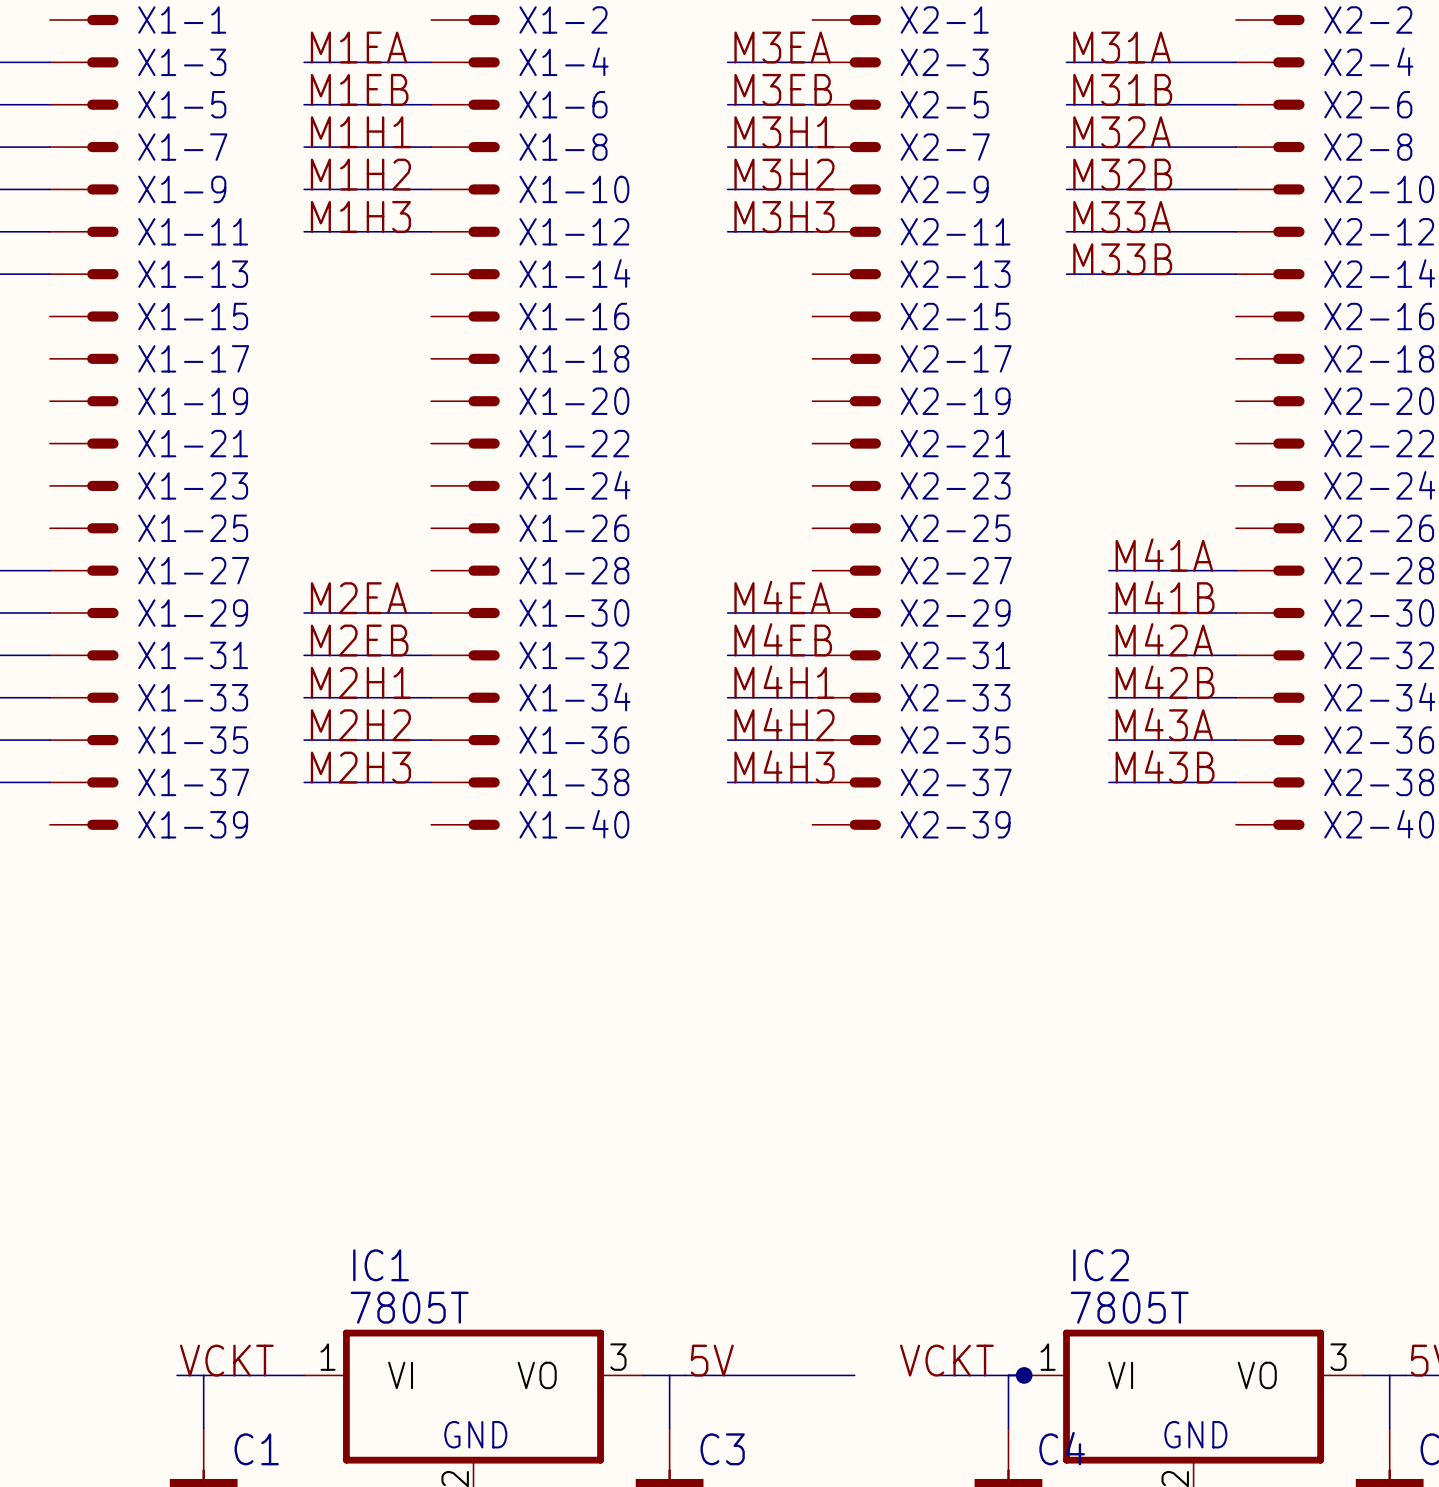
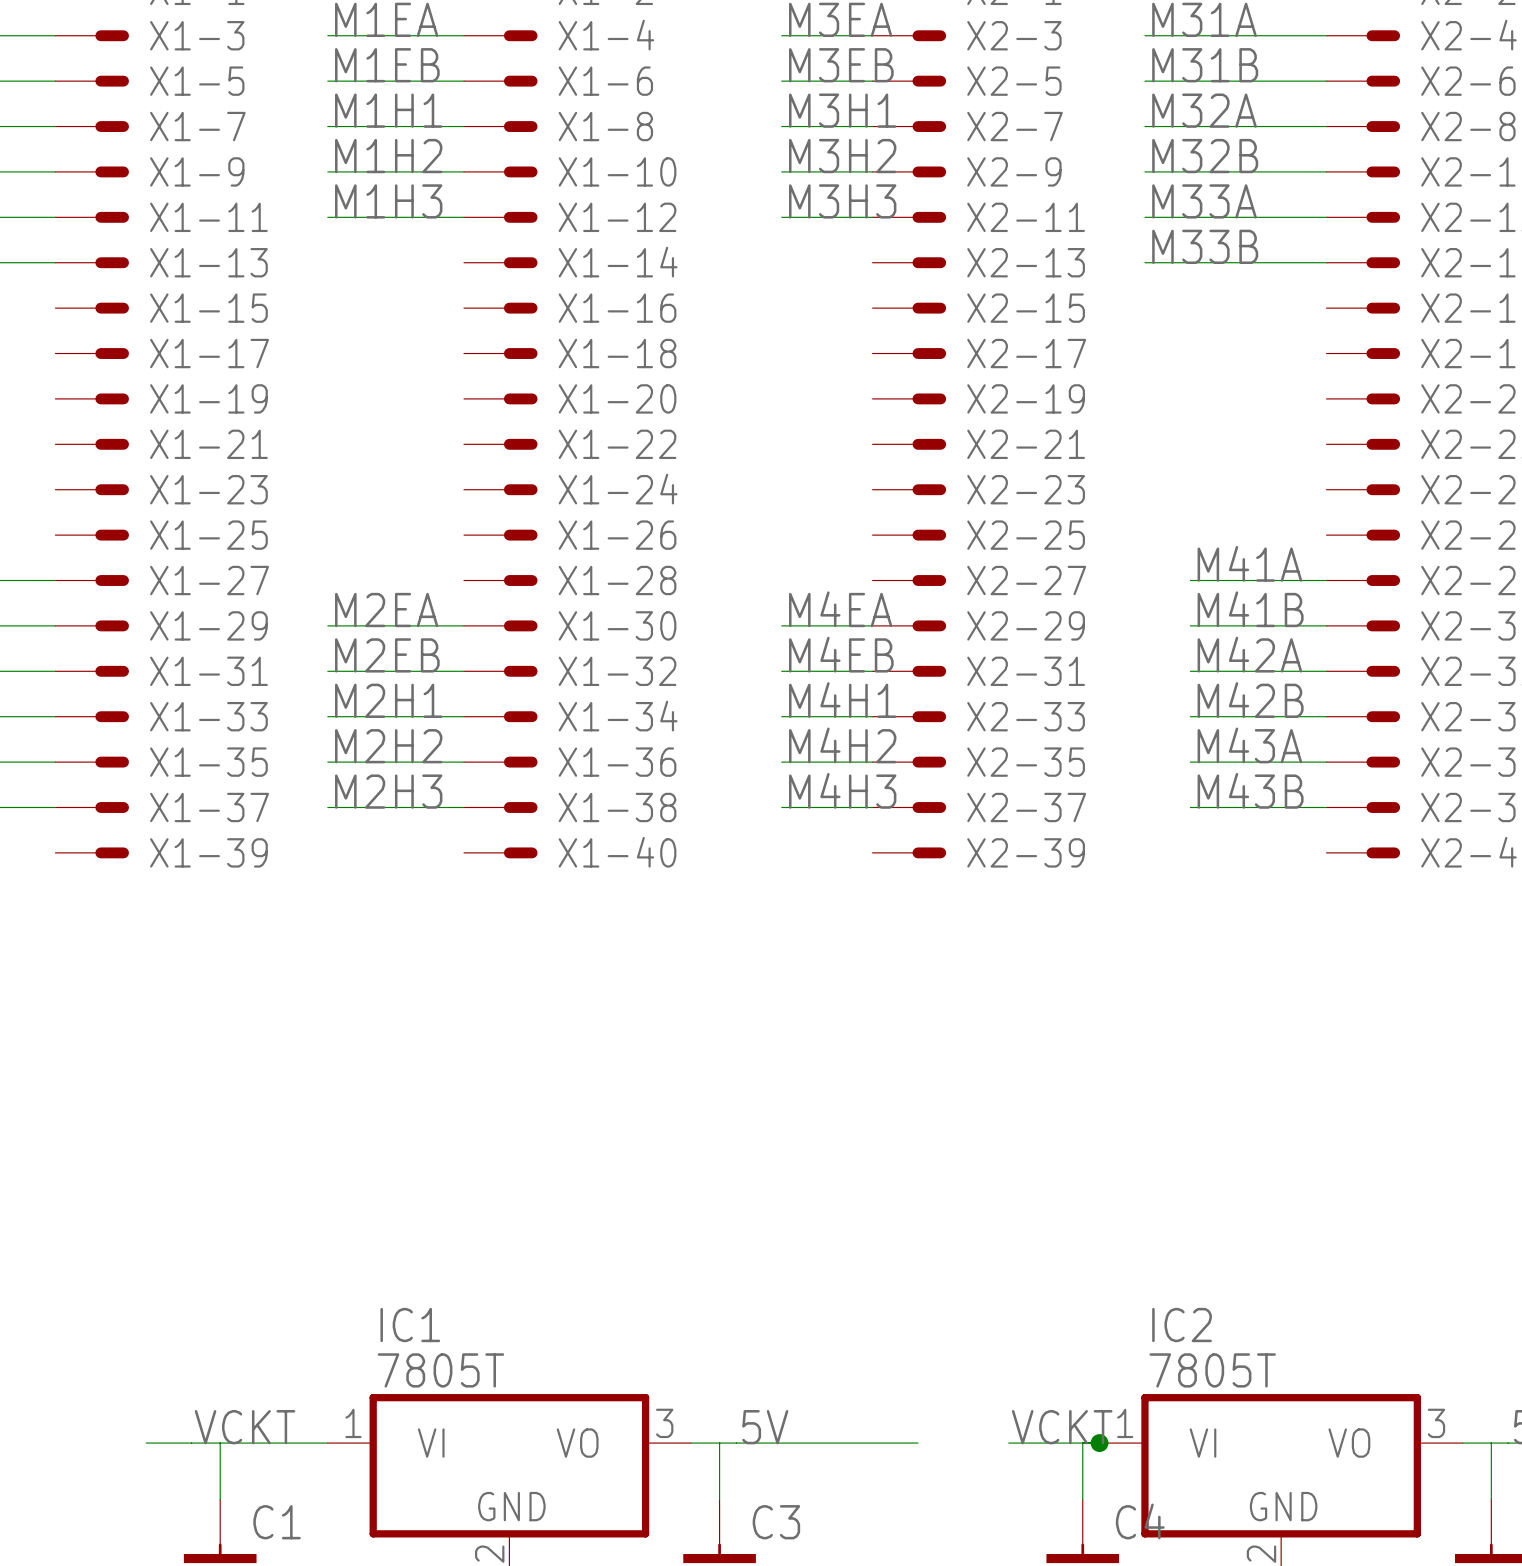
label position: VCKT (946, 1360) -> VCKT (1062, 1427)
wire: none -> (146, 1443) (191, 1443)

